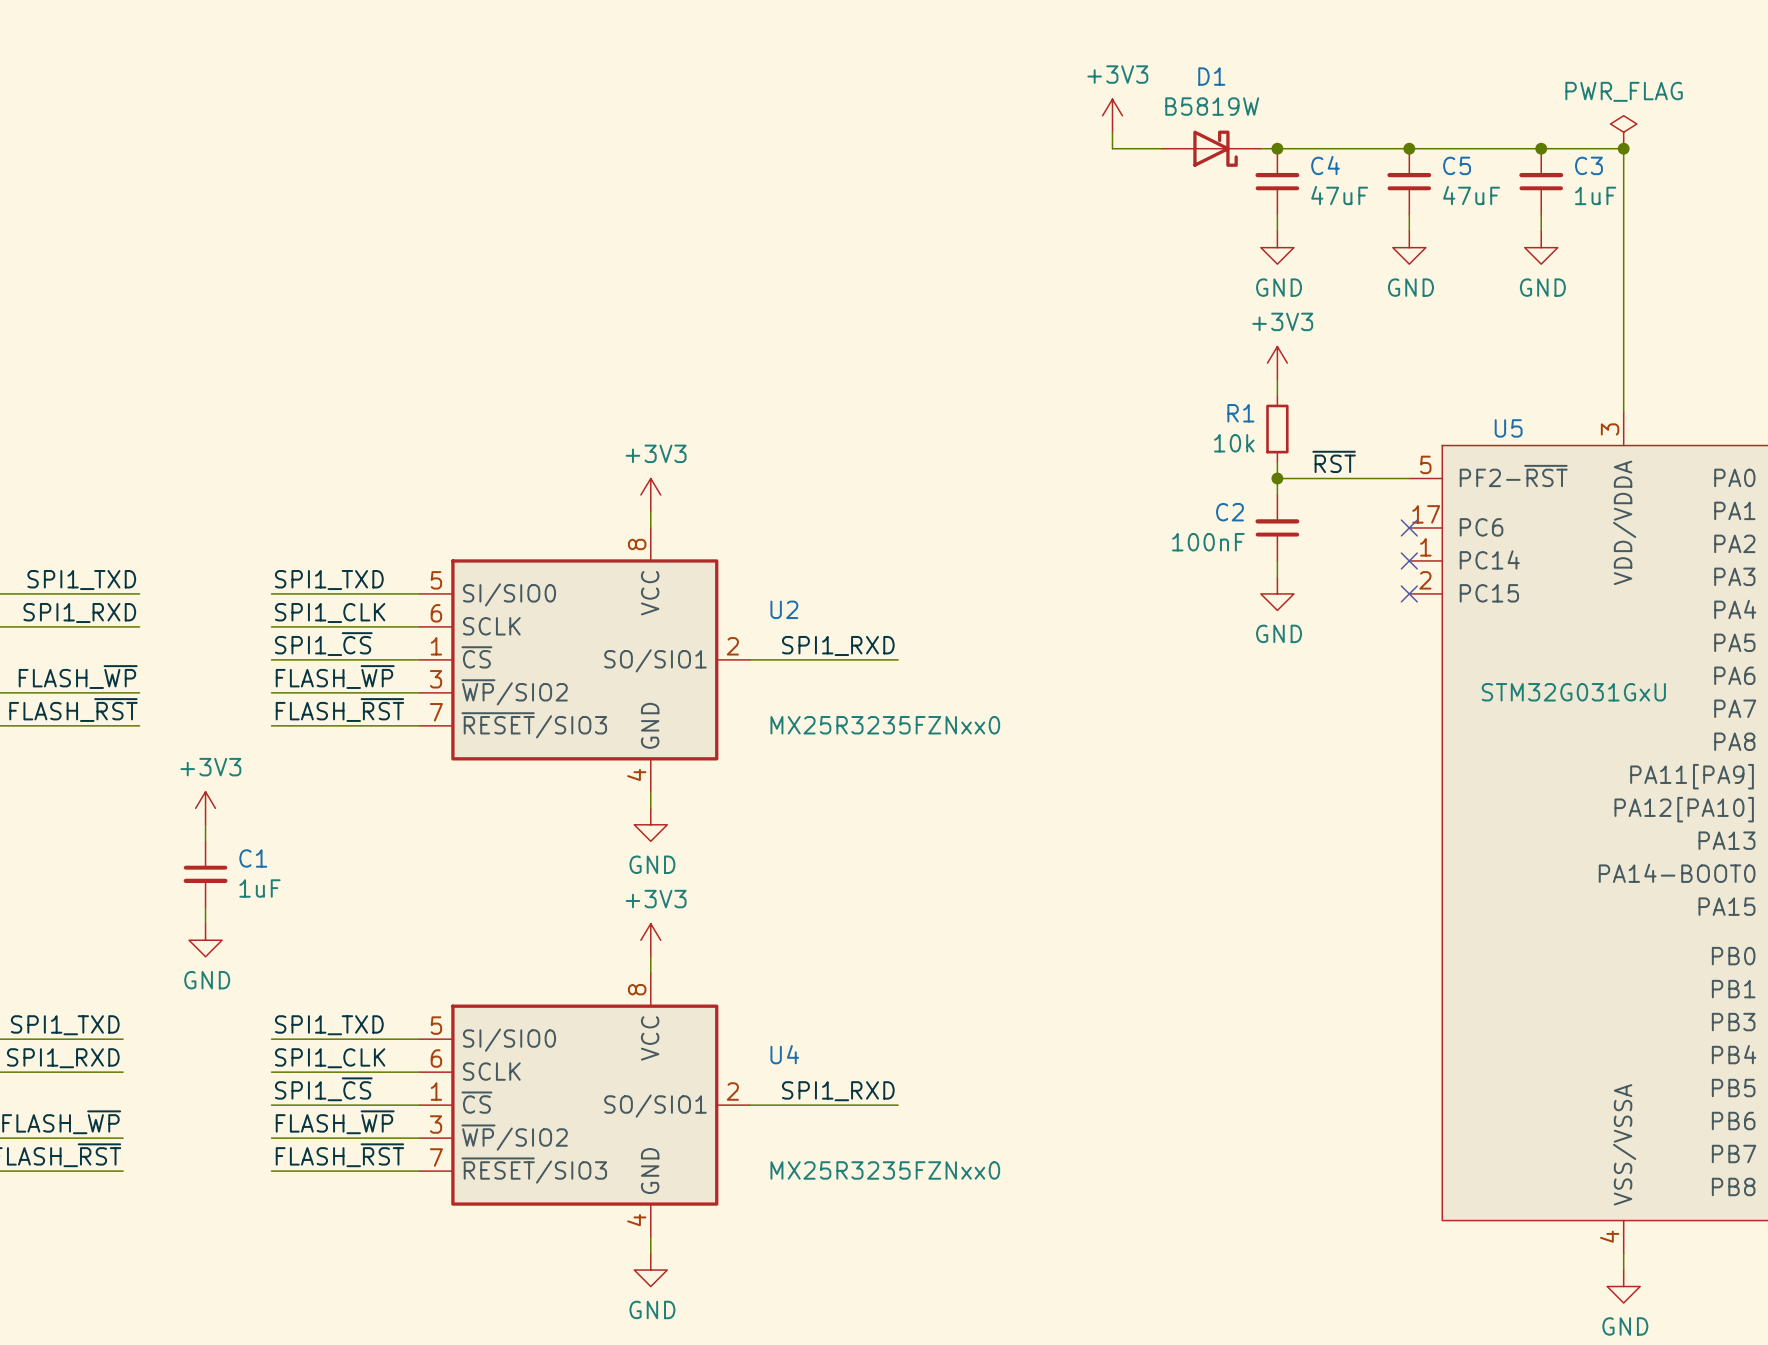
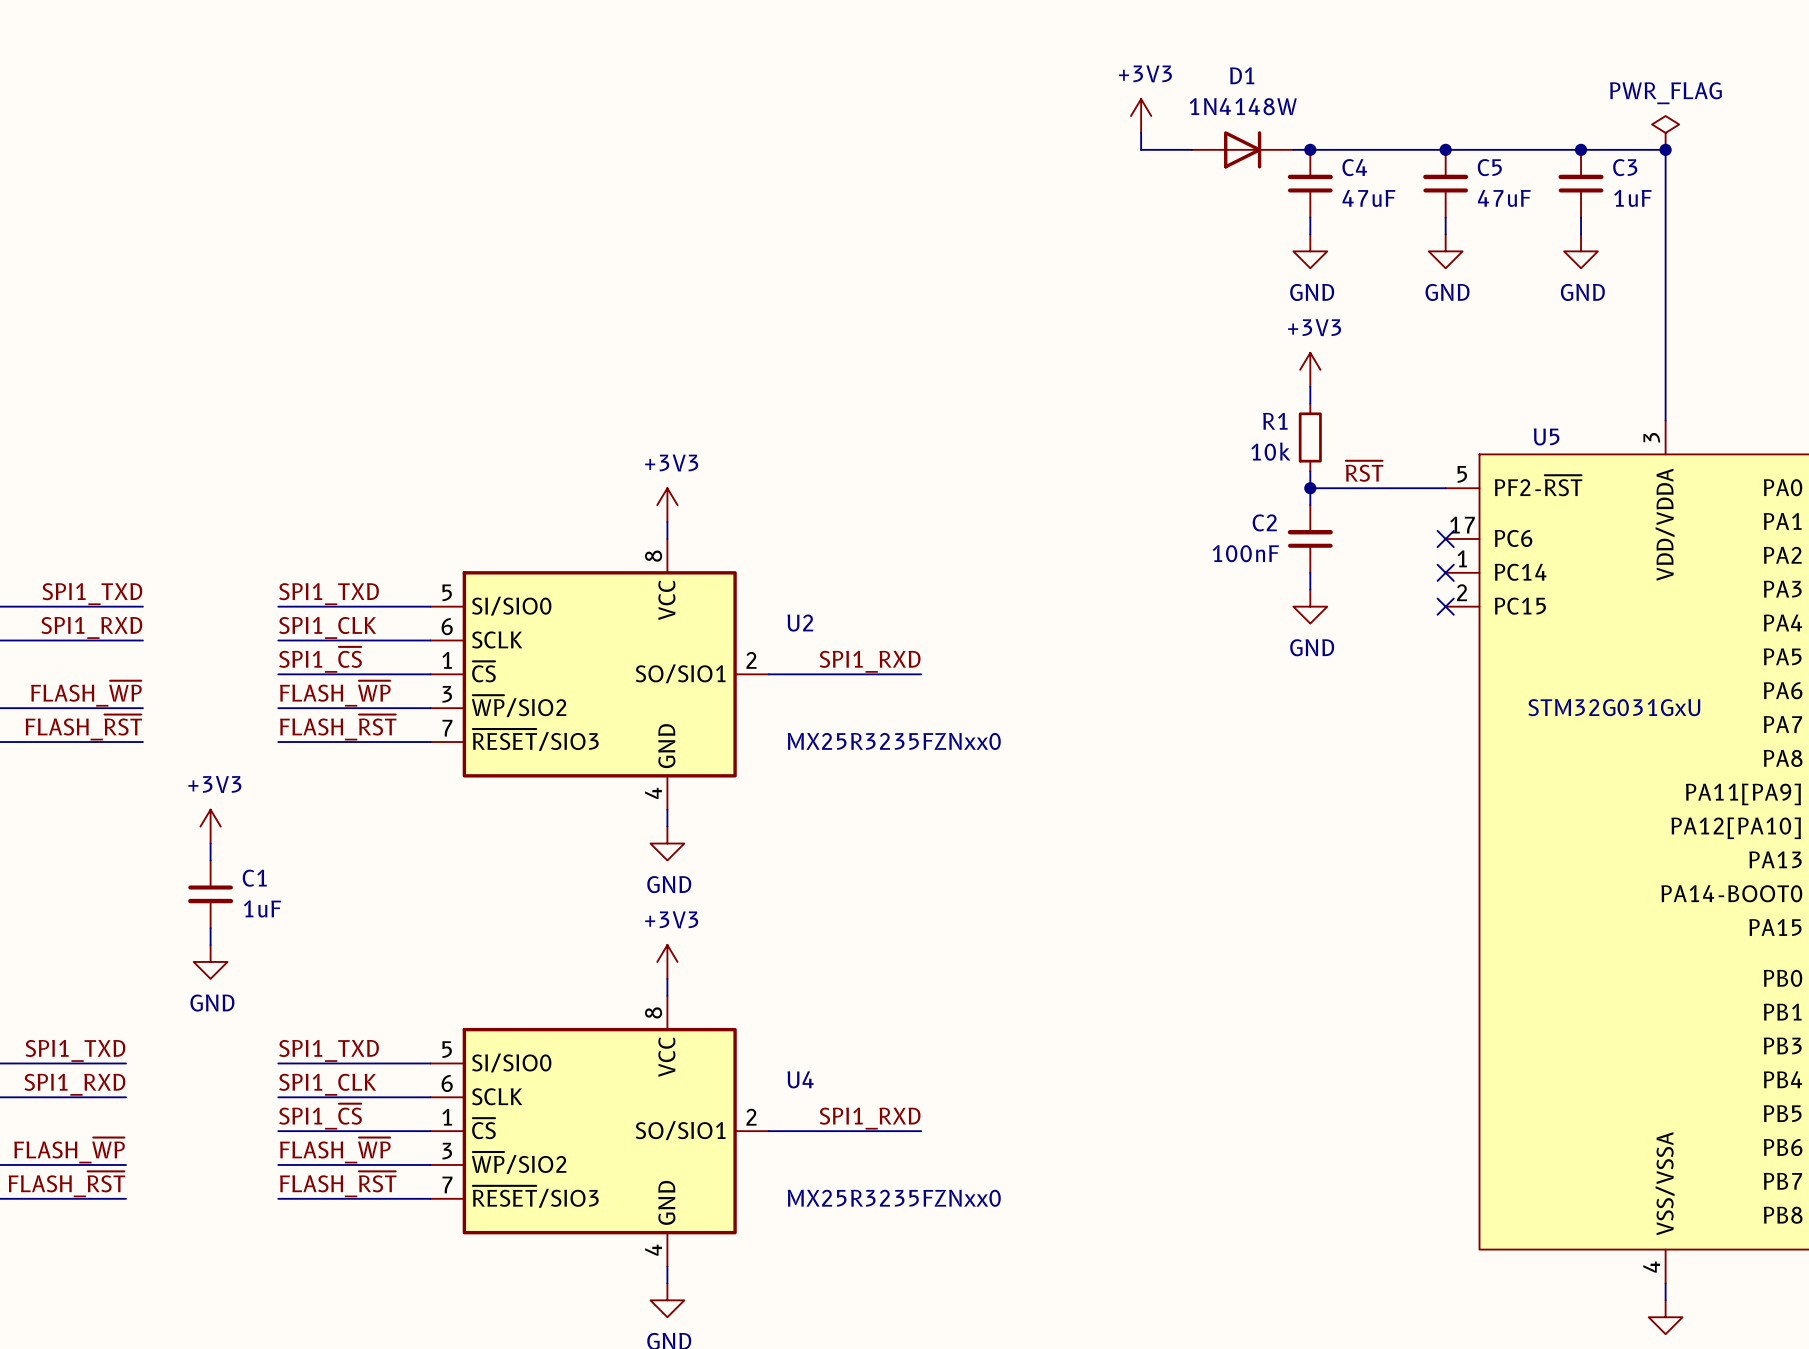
D1 value: B5819W (1212, 106) -> 1N4148W (1243, 106)
D1 symbol: [1161, 130, 1261, 167] -> [1191, 131, 1294, 169]

